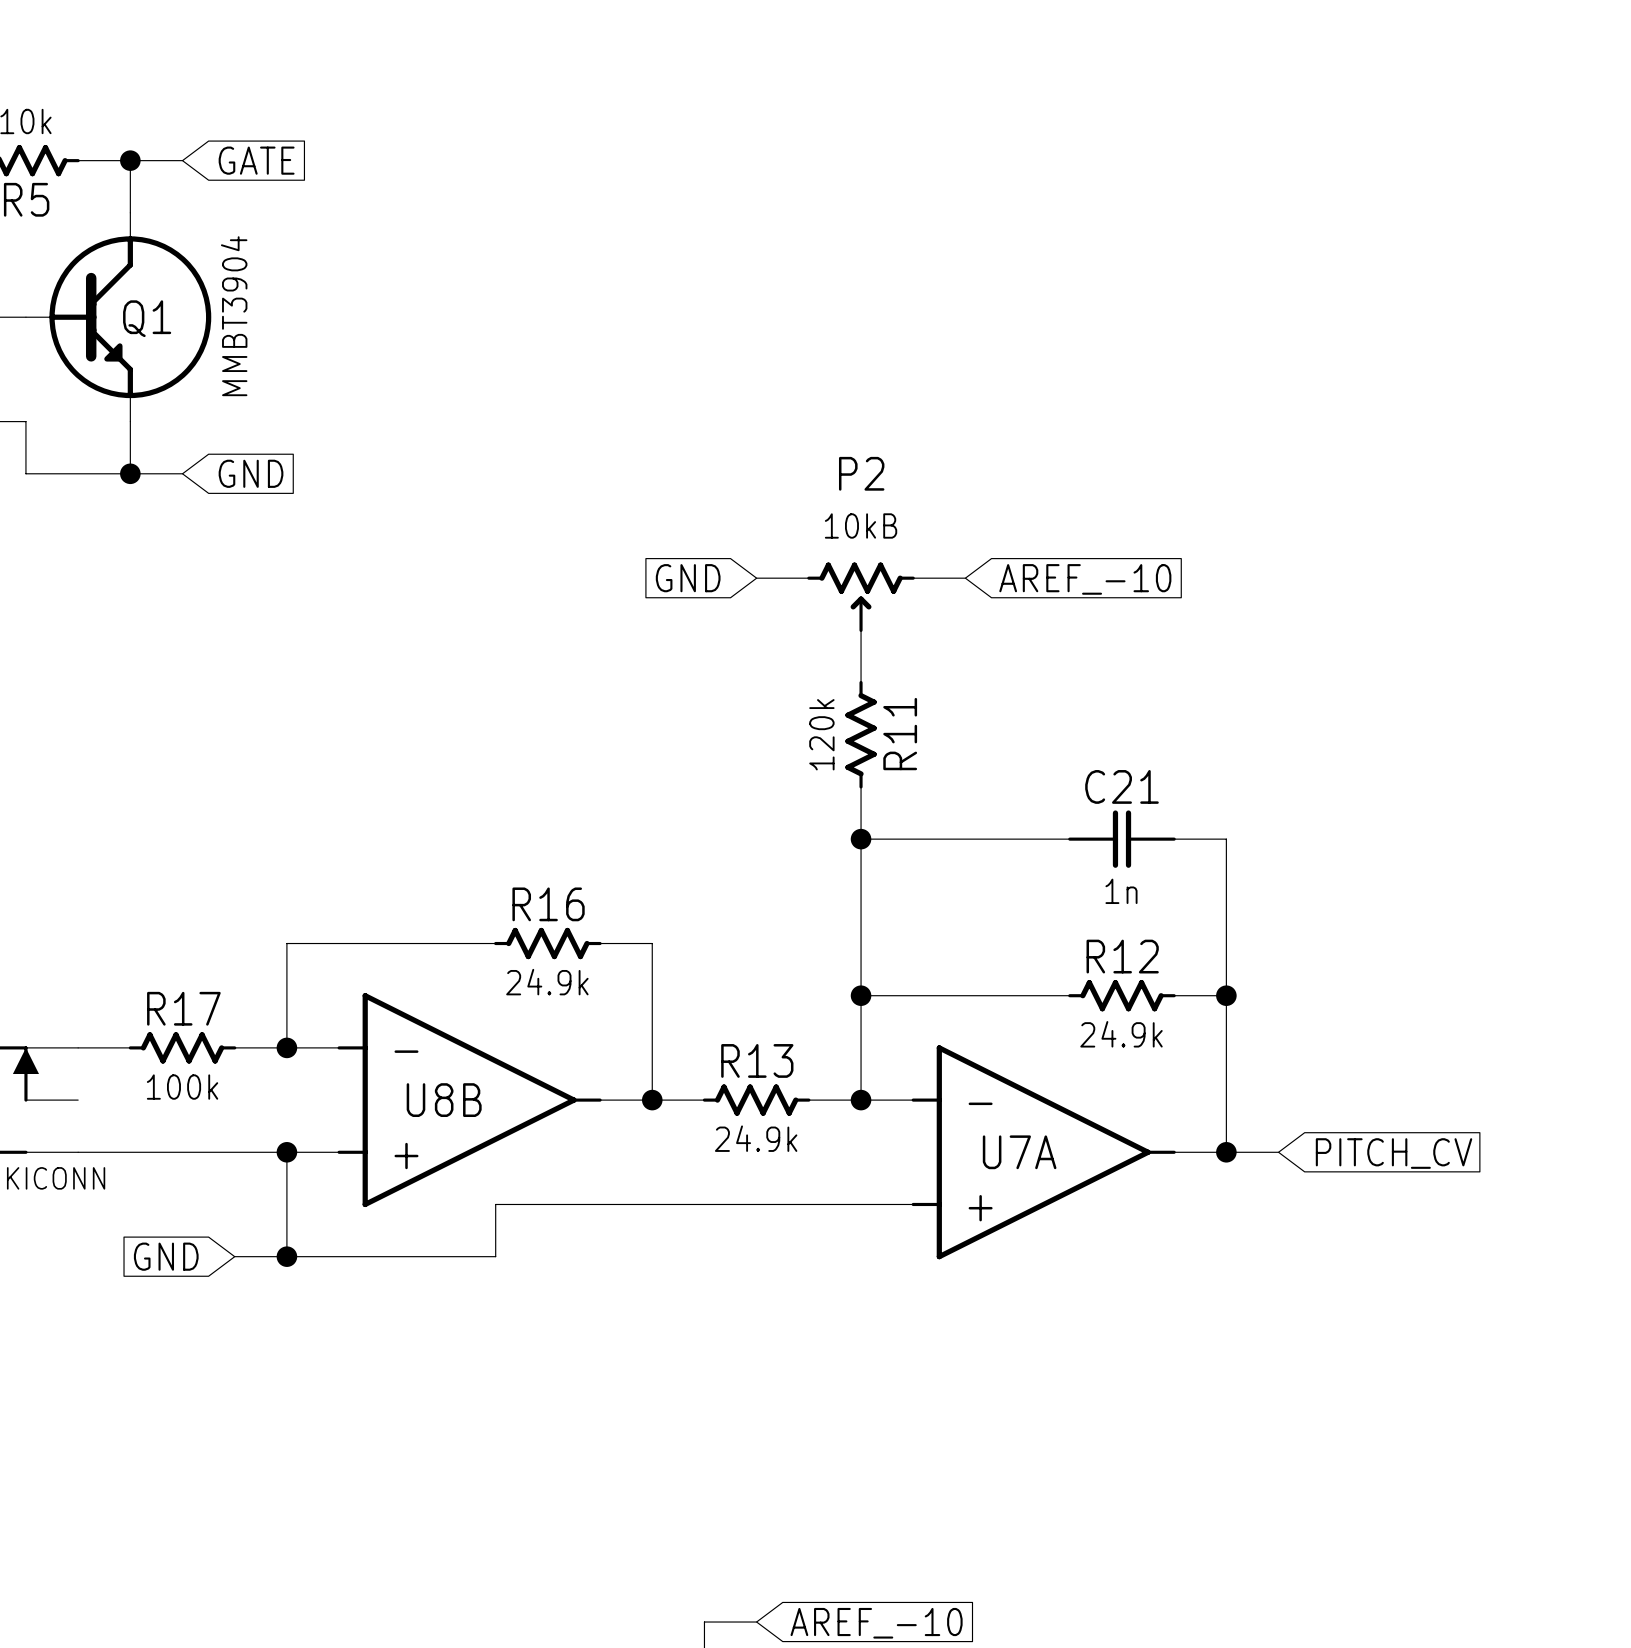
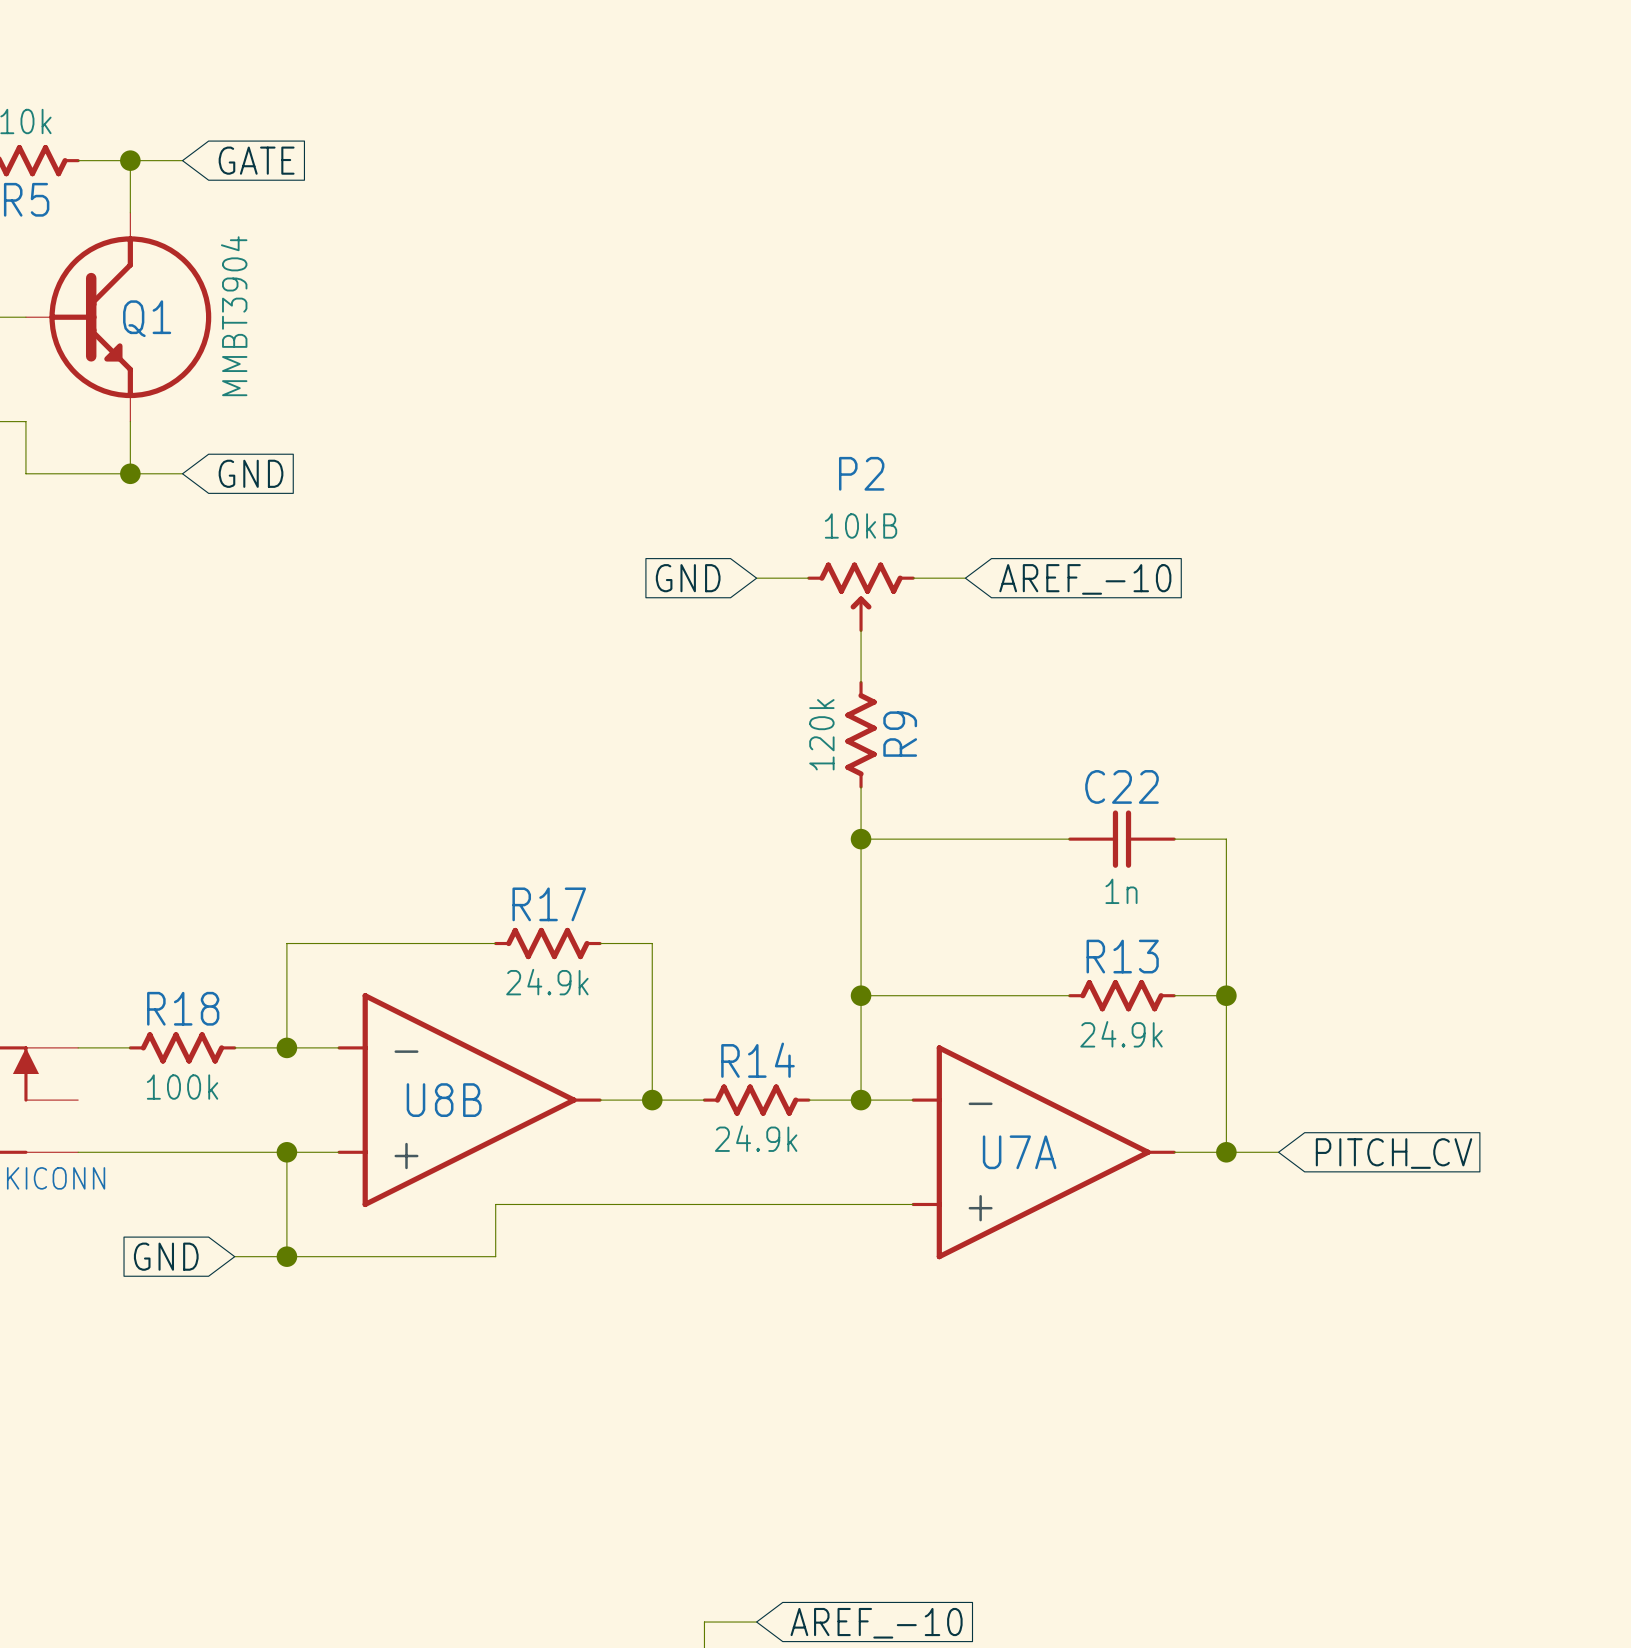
R11 name: R11 (900, 734) -> R9 (900, 734)
C21 name: C21 (1121, 786) -> C22 (1121, 786)
R16 name: R16 (548, 904) -> R17 (549, 904)
R12 name: R12 (1122, 956) -> R13 (1122, 956)
R17 name: R17 (183, 1008) -> R18 (183, 1008)
R13 name: R13 (757, 1060) -> R14 (757, 1060)

